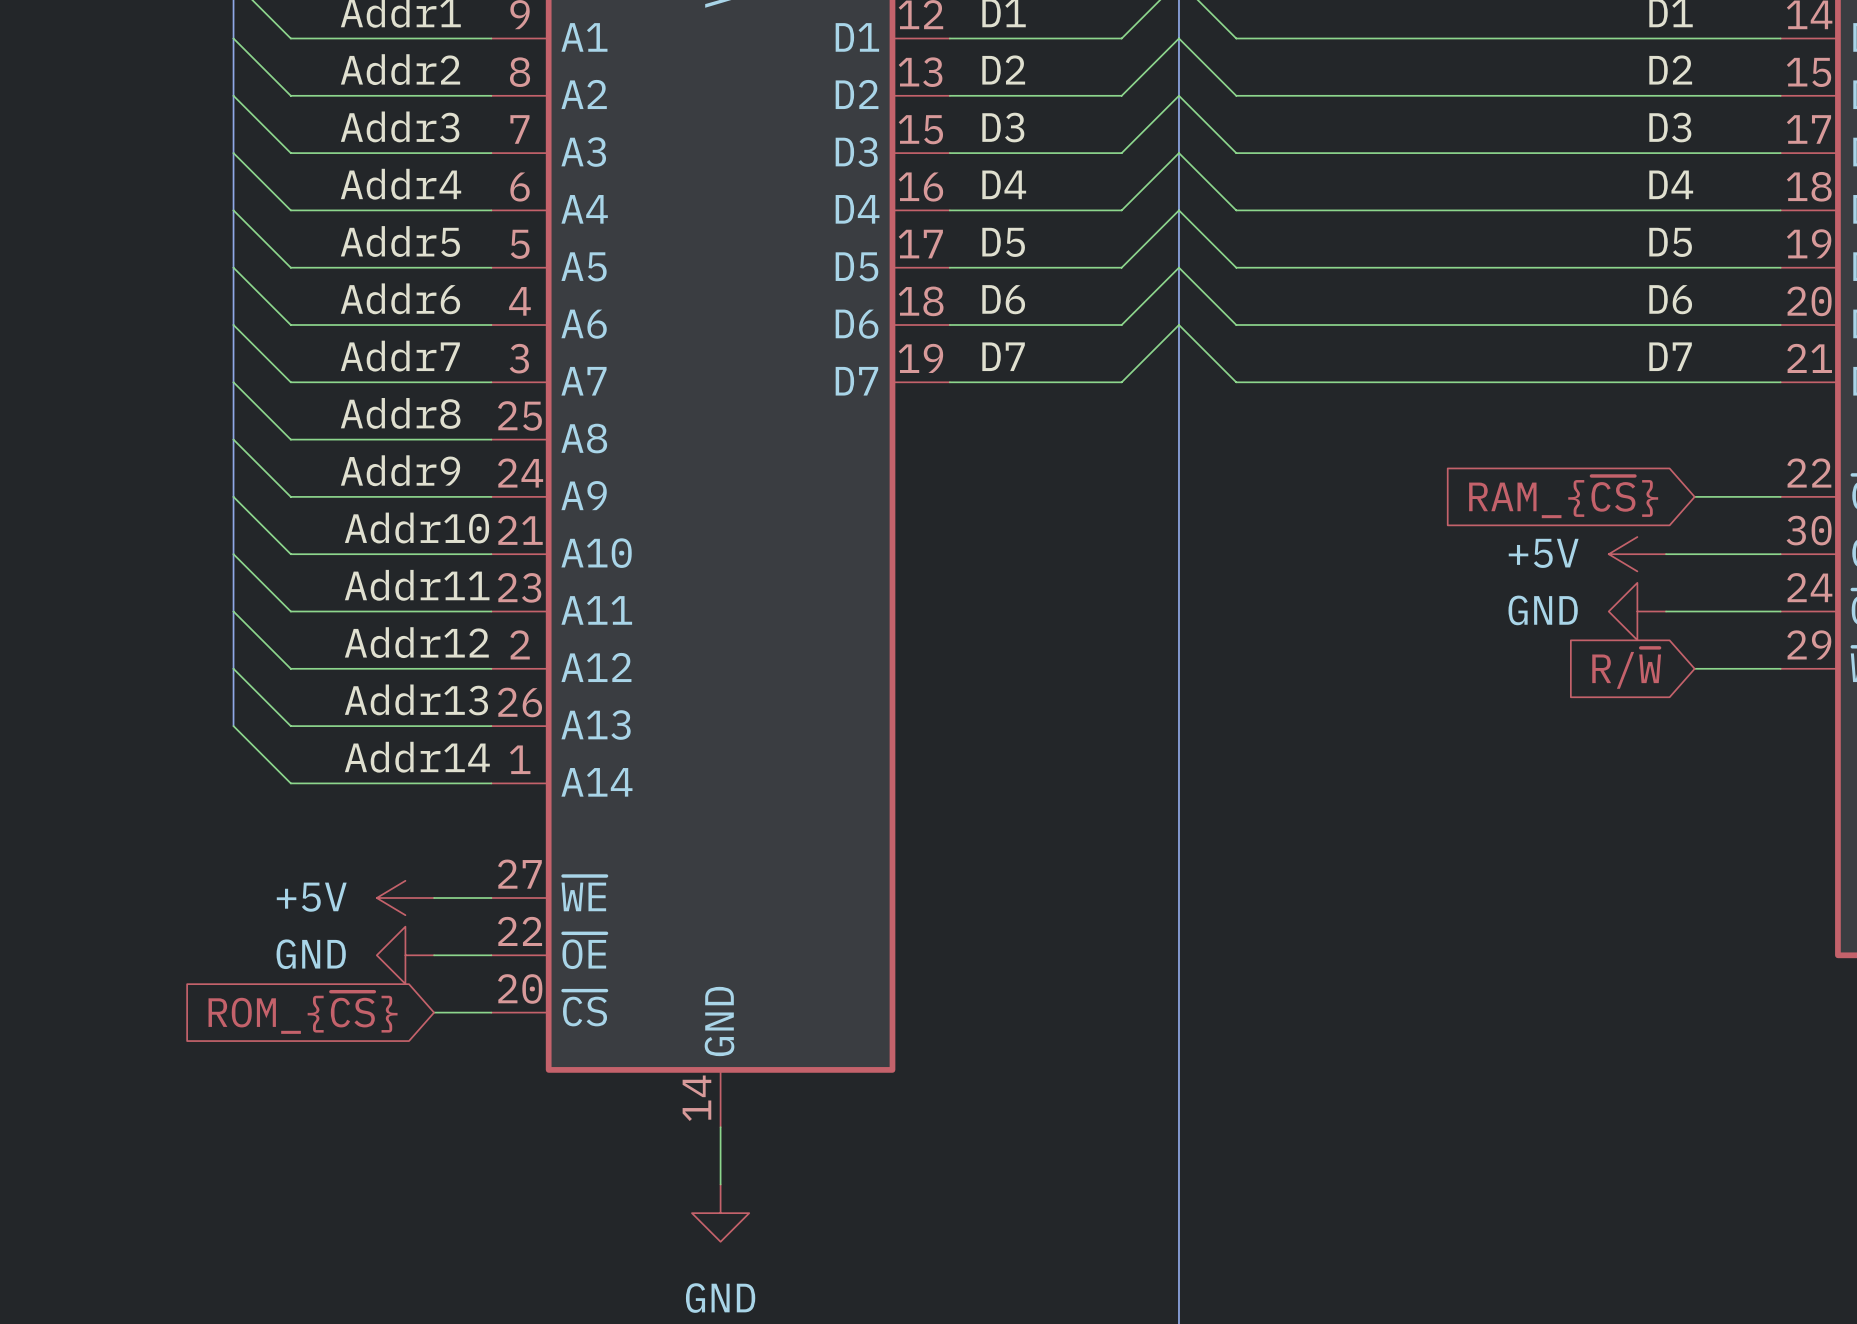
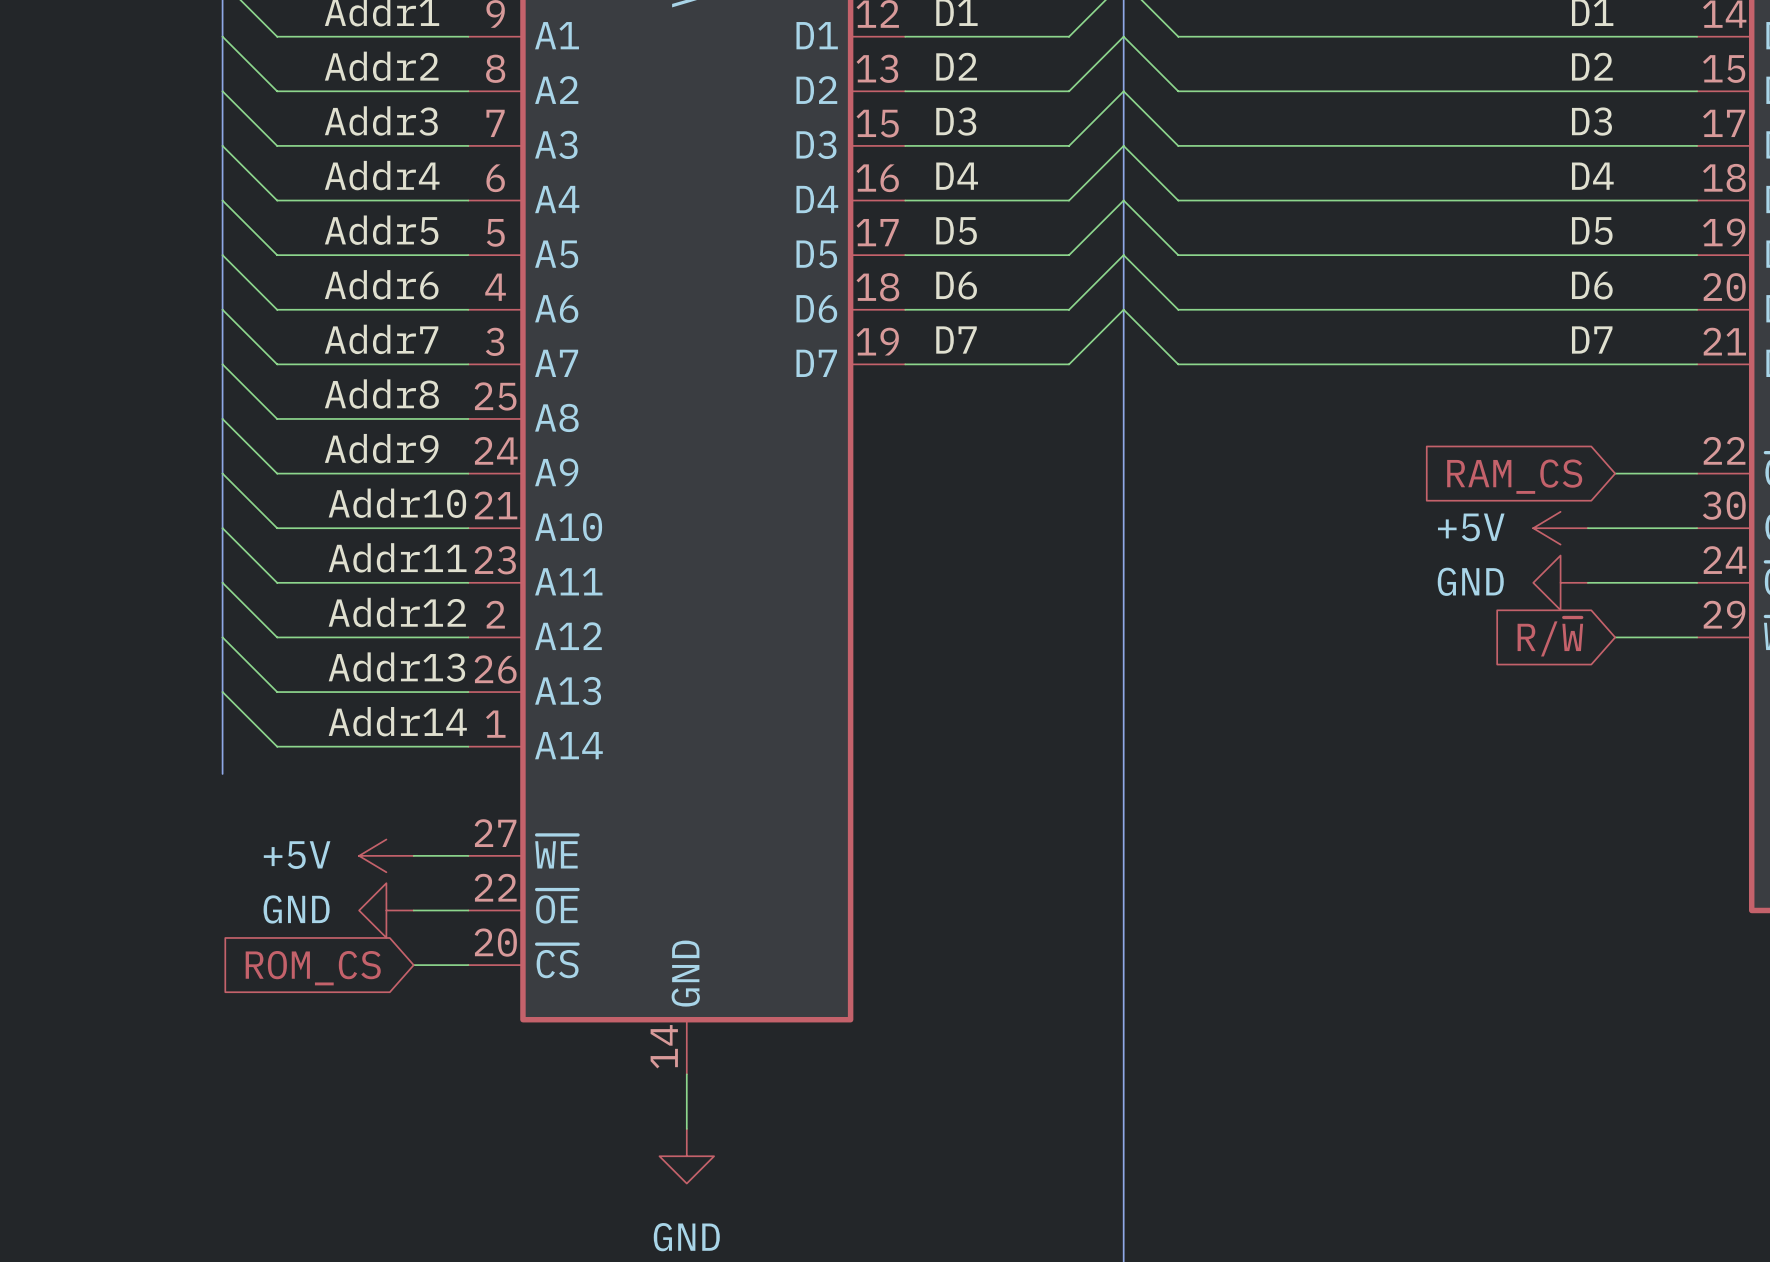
global label: RAM_{~{CS}} (1563, 497) -> RAM_CS (1514, 476)
bus: none -> (222, 692) (222, 773)
global label: ROM_{~{CS}} (303, 1012) -> ROM_CS (313, 968)

